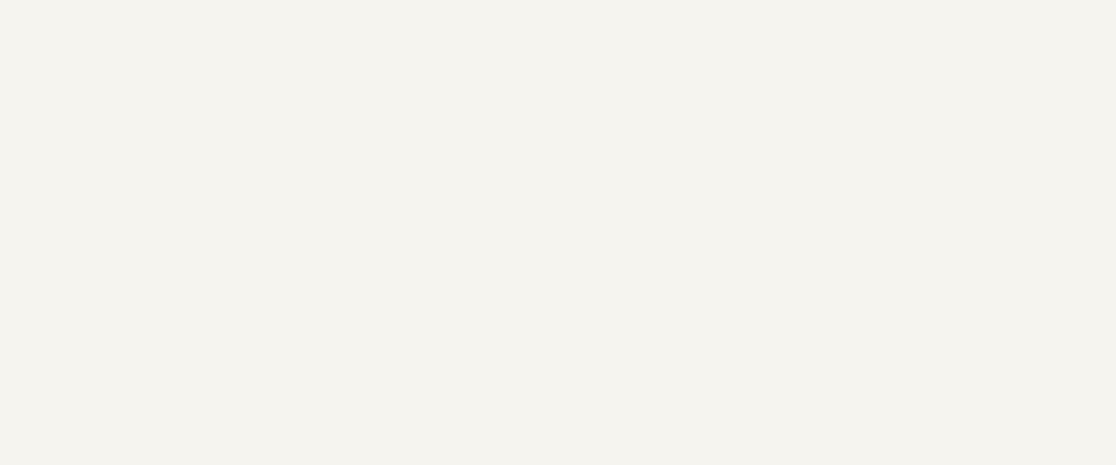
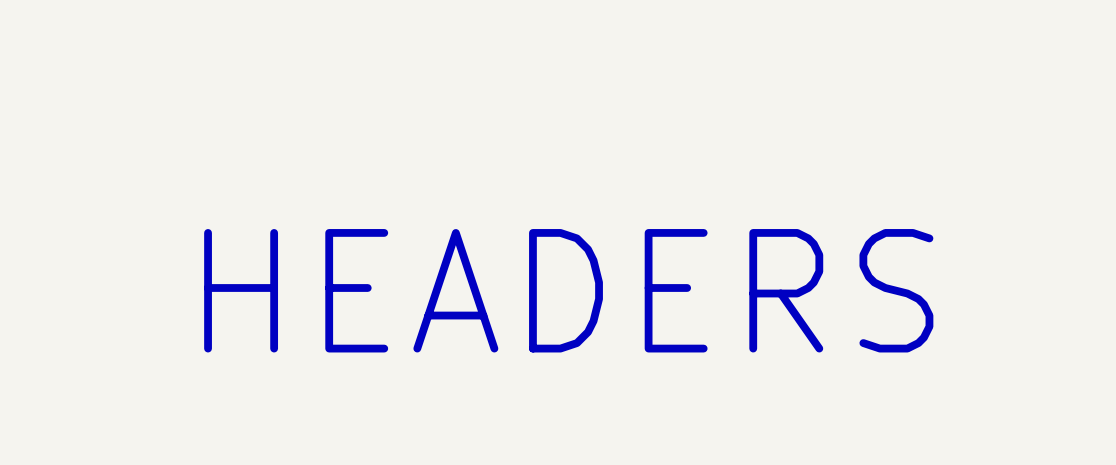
text: none -> HEADERS (568, 290)

